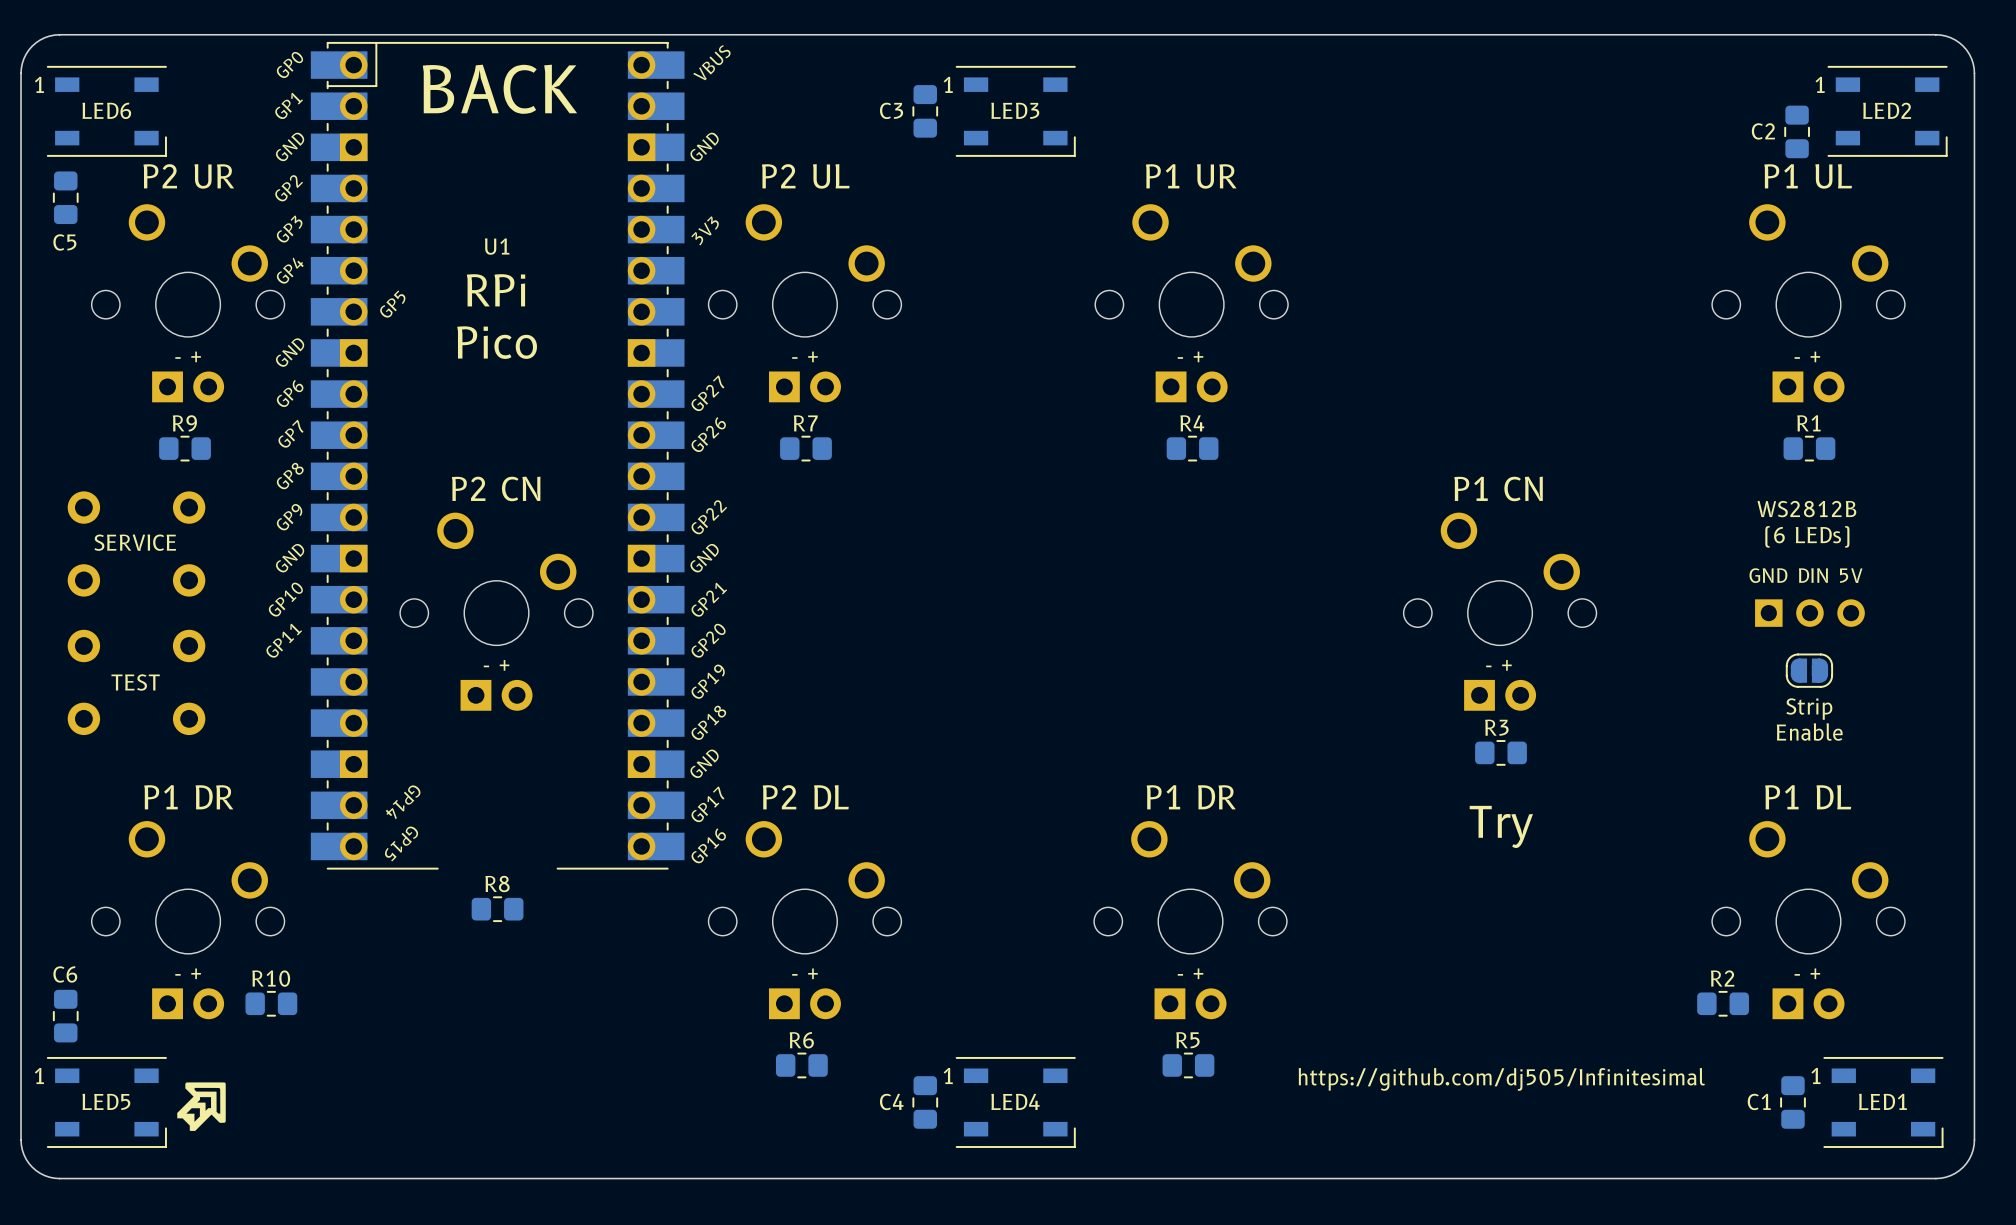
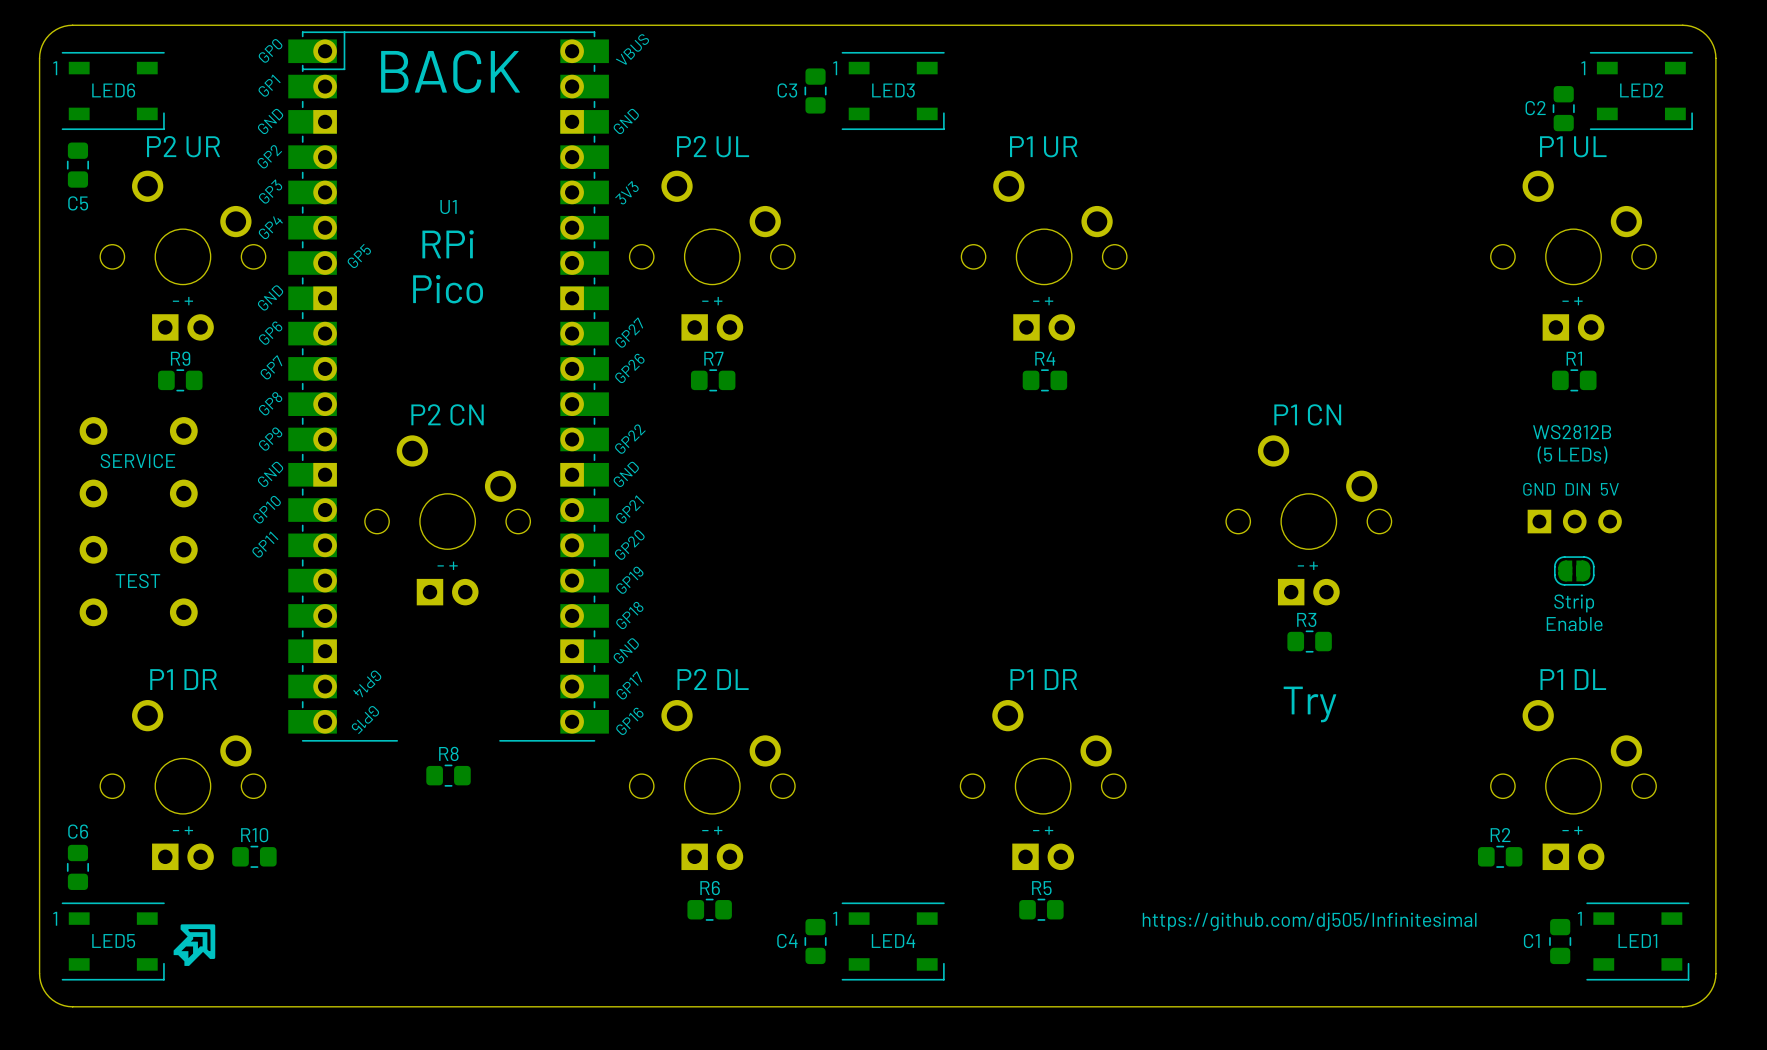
text: (6 LEDs) (1807, 536) -> (5 LEDs) (1572, 454)

